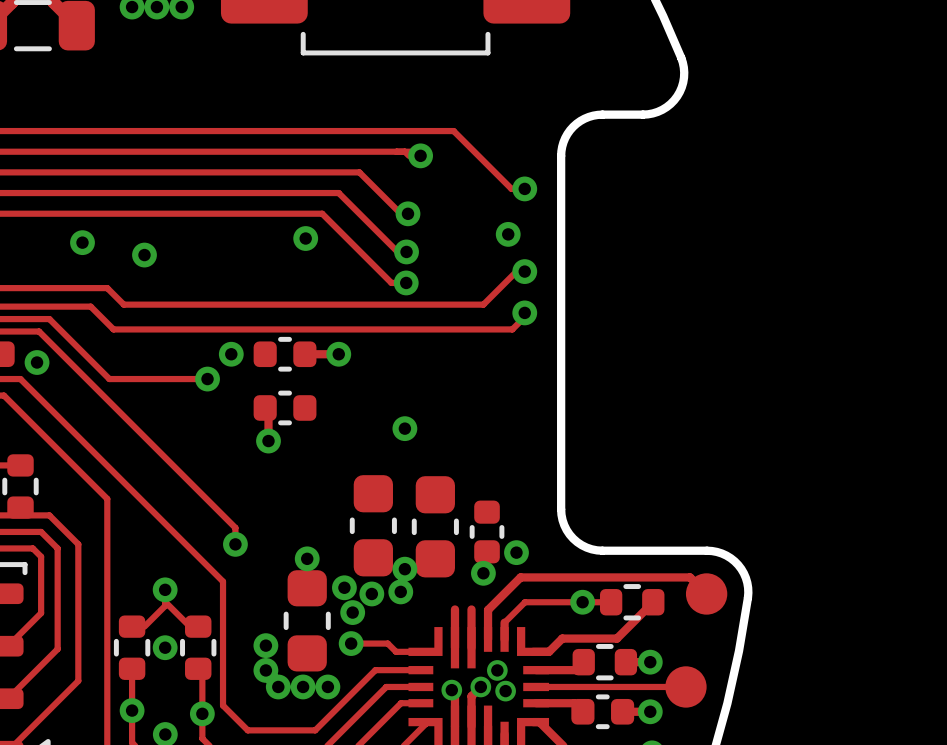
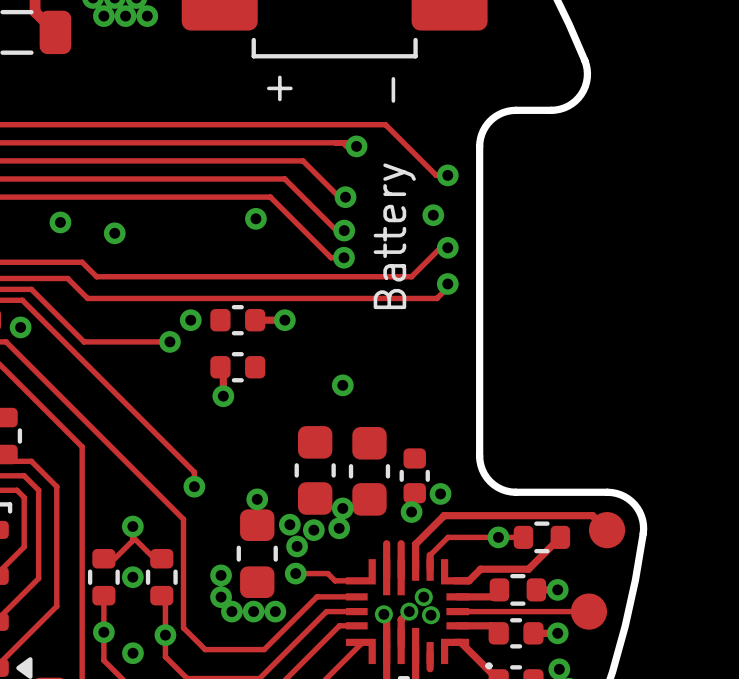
text: none -> + (279, 88)
text: none -> - (393, 89)
text: none -> Battery (394, 236)

